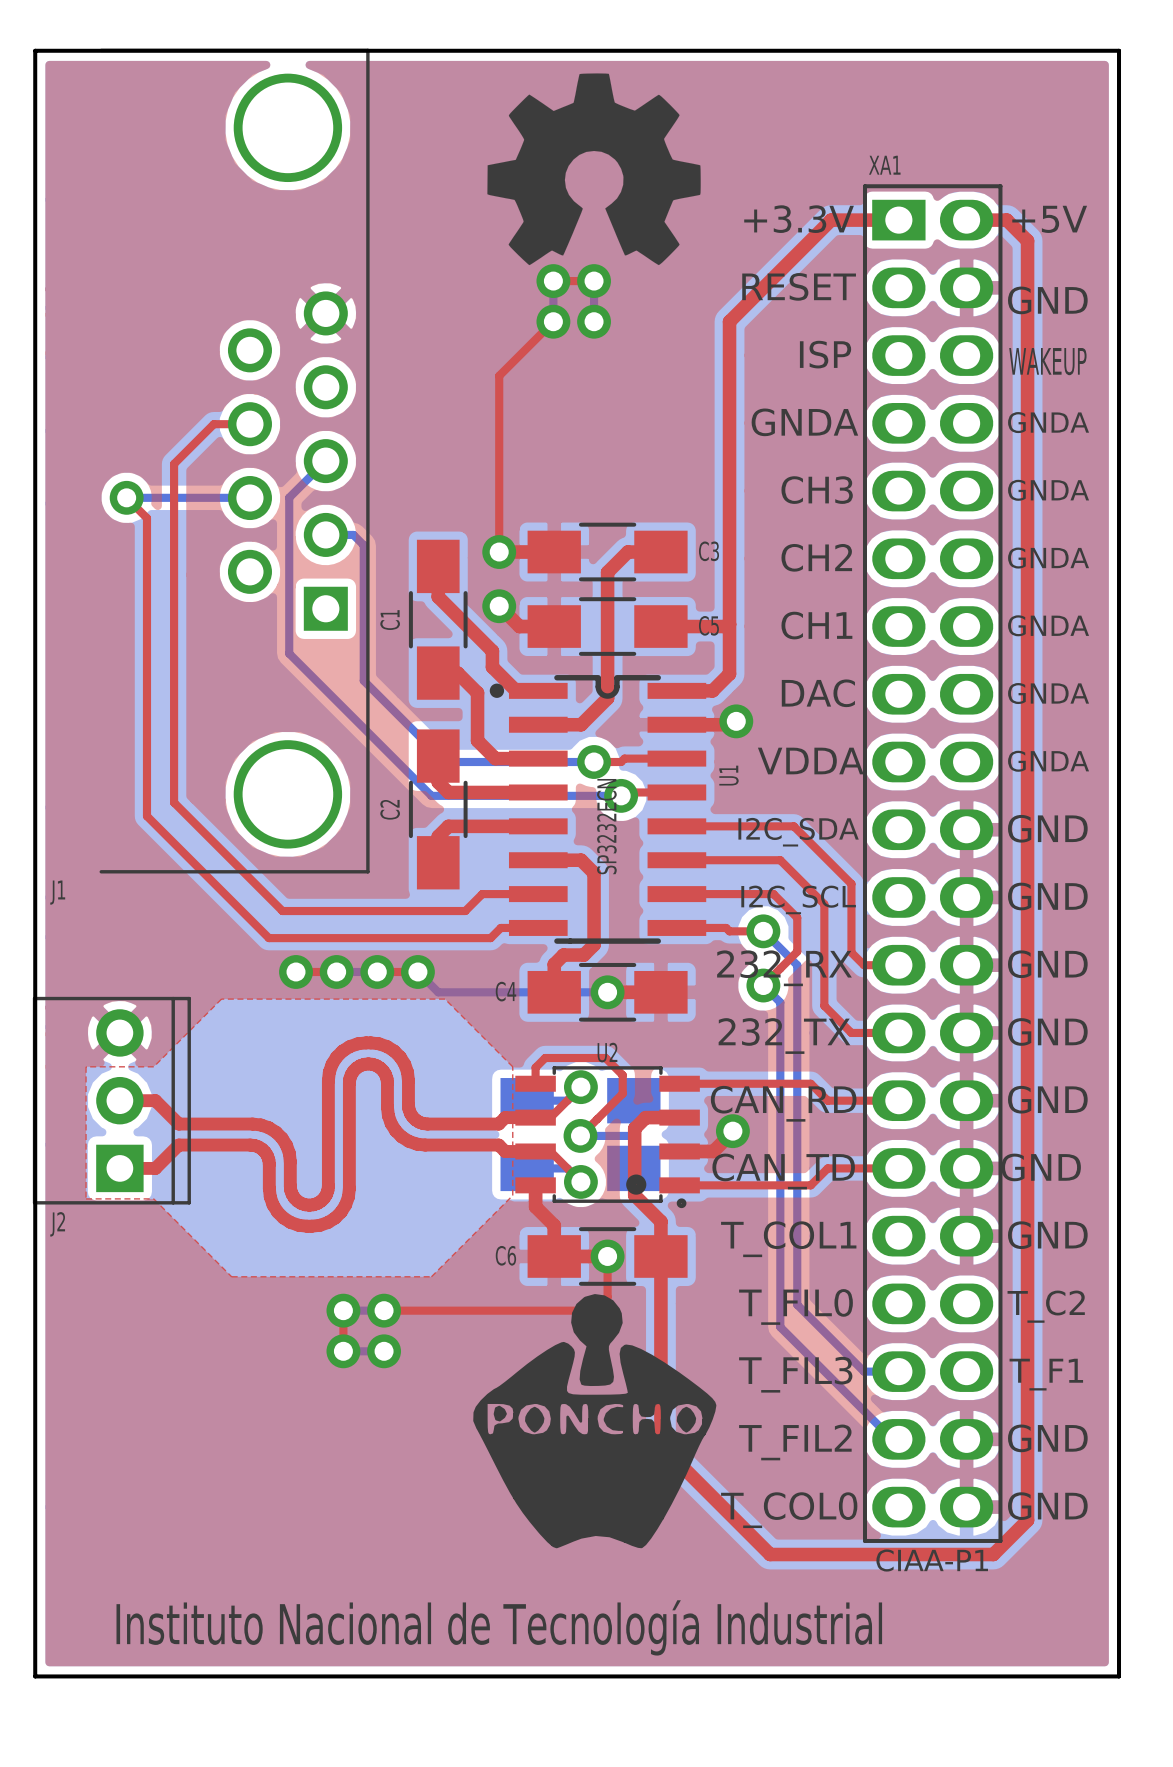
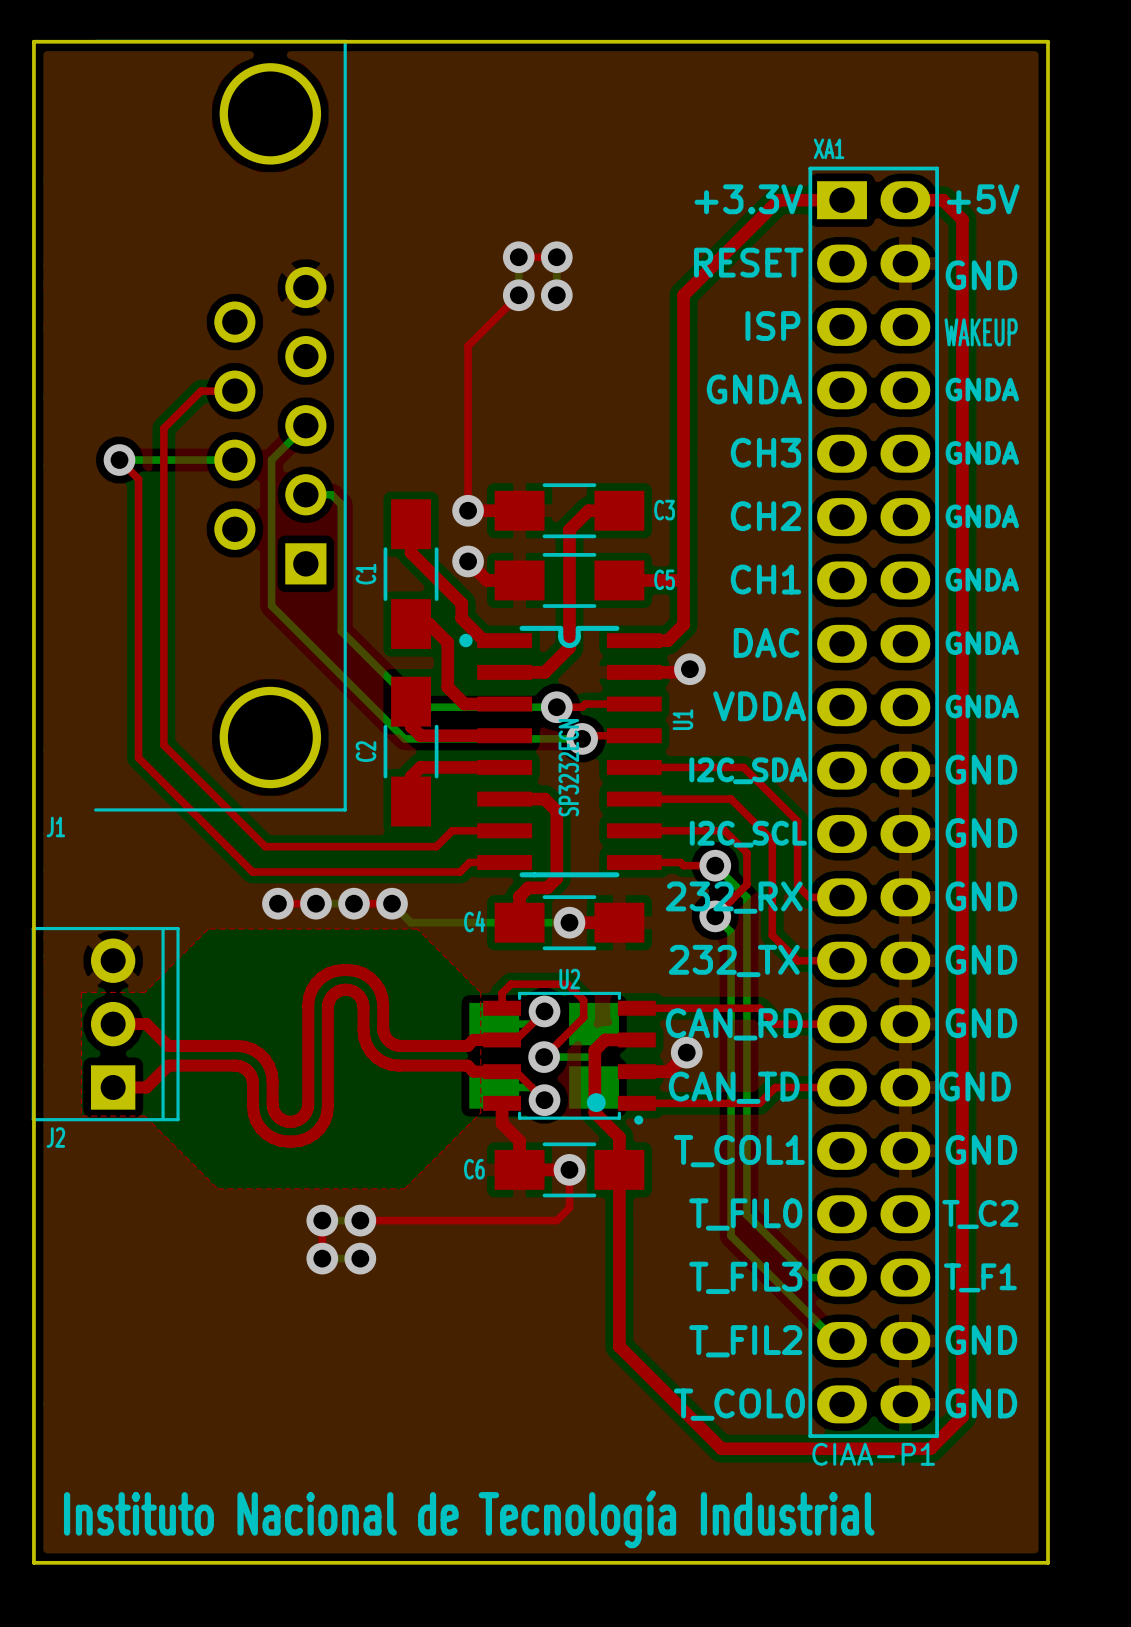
drawing: [487, 73, 701, 266] -> none
drawing: [473, 1294, 717, 1549] -> none

